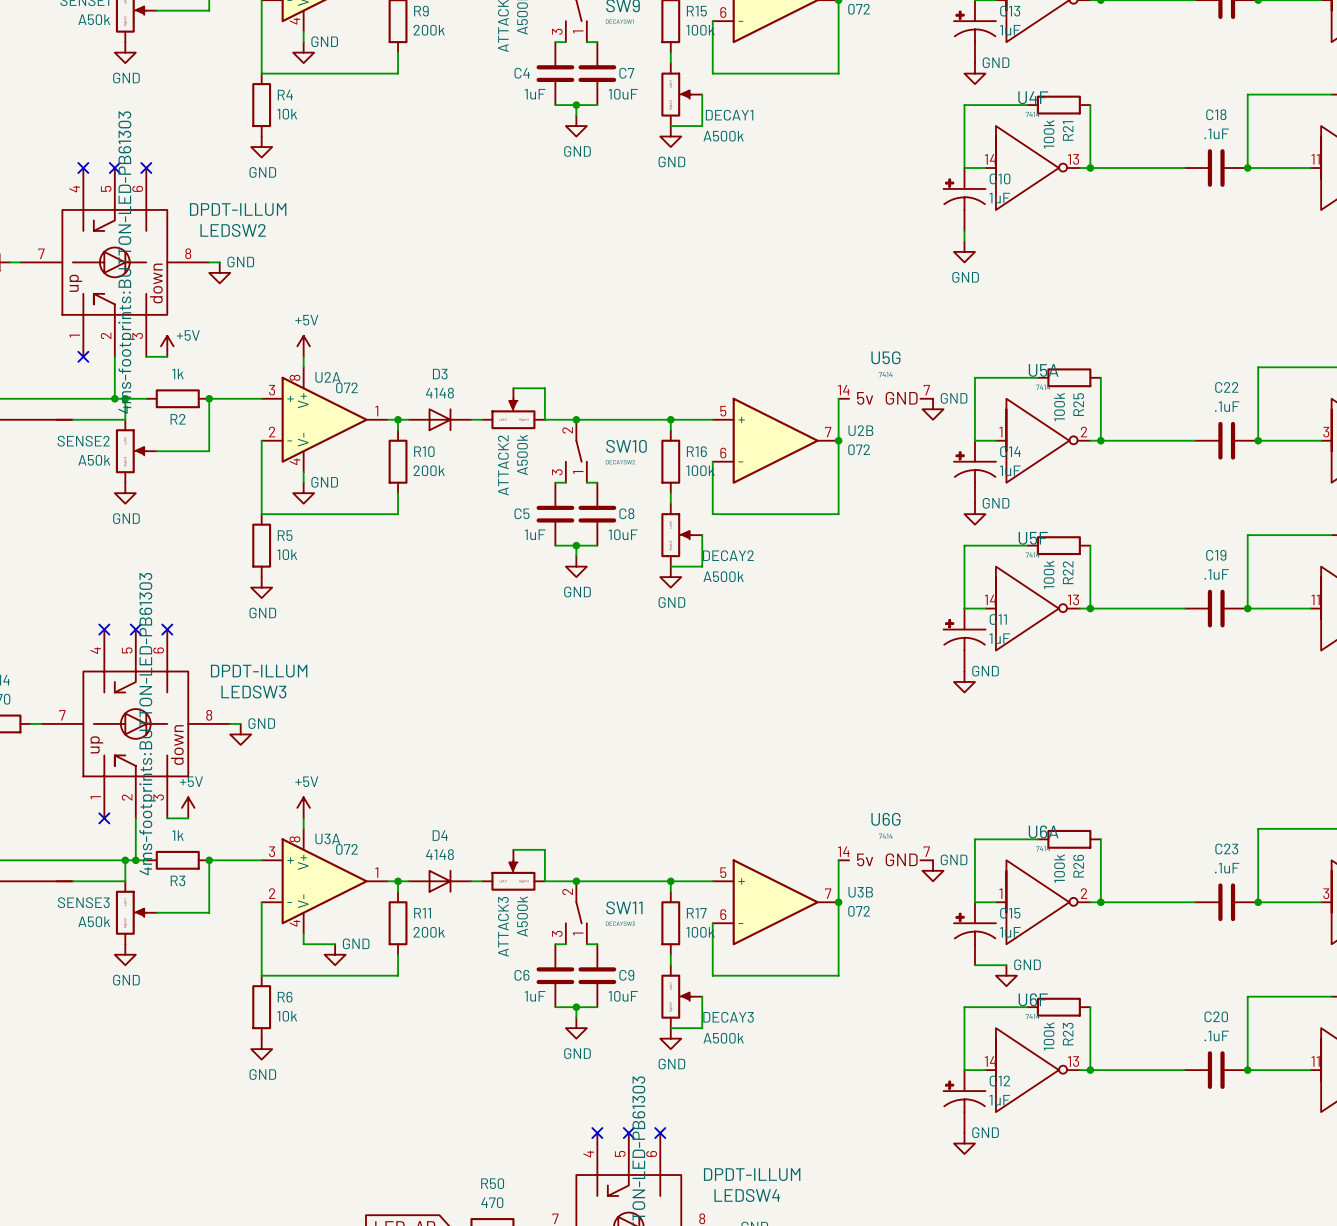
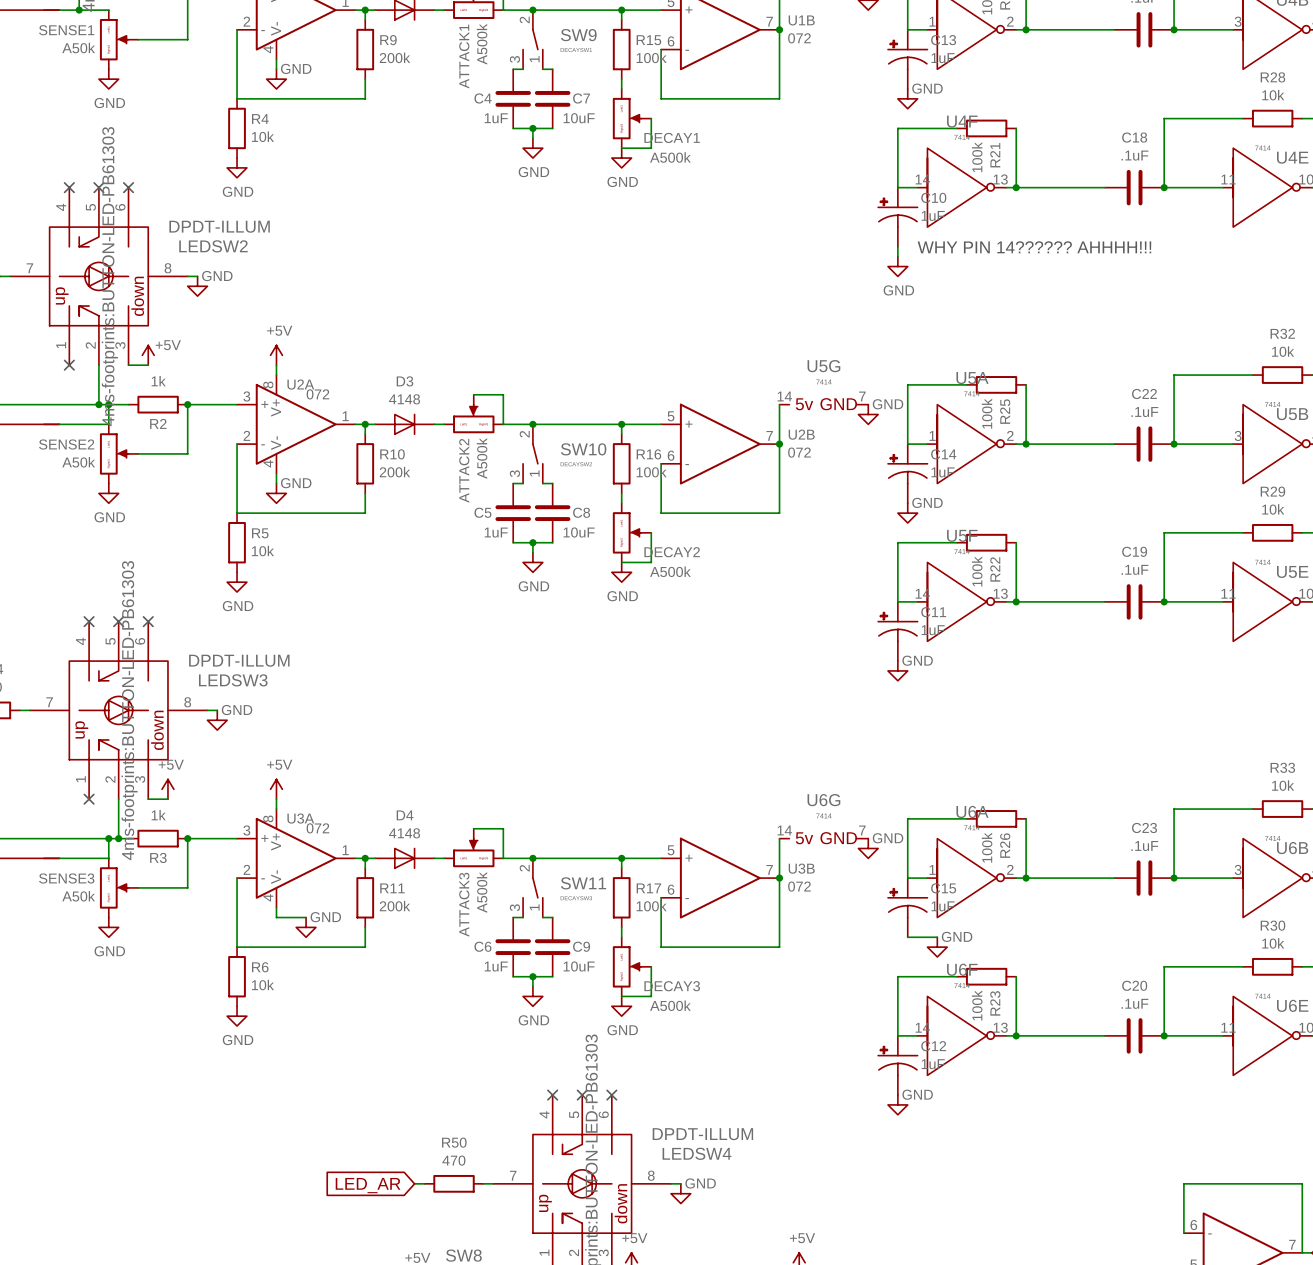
text: none -> WHY PIN 14?????? AHHHH!!! (1034, 247)

